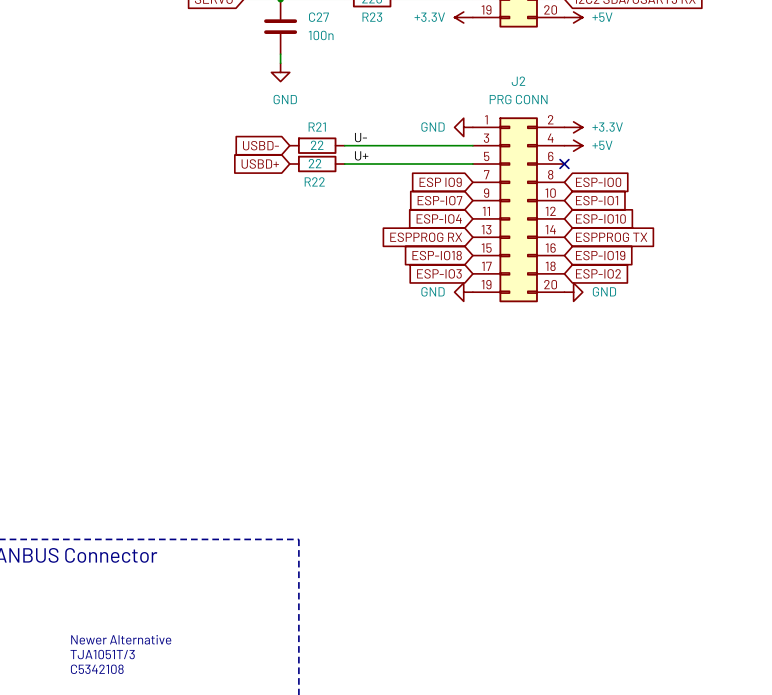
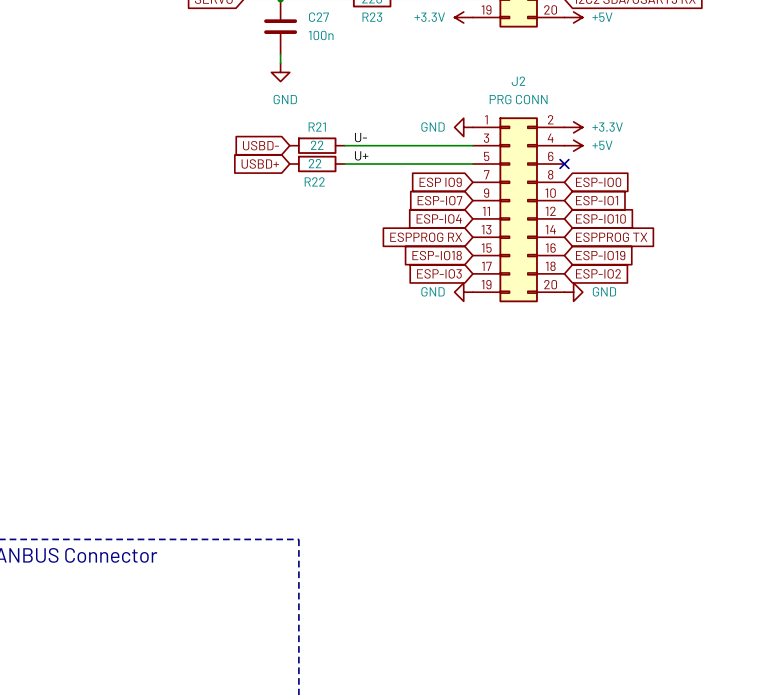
text: Newer Alternative (121, 639) -> none
text: TJA1051T/3 (102, 654) -> none
text: C5342108 (97, 669) -> none

